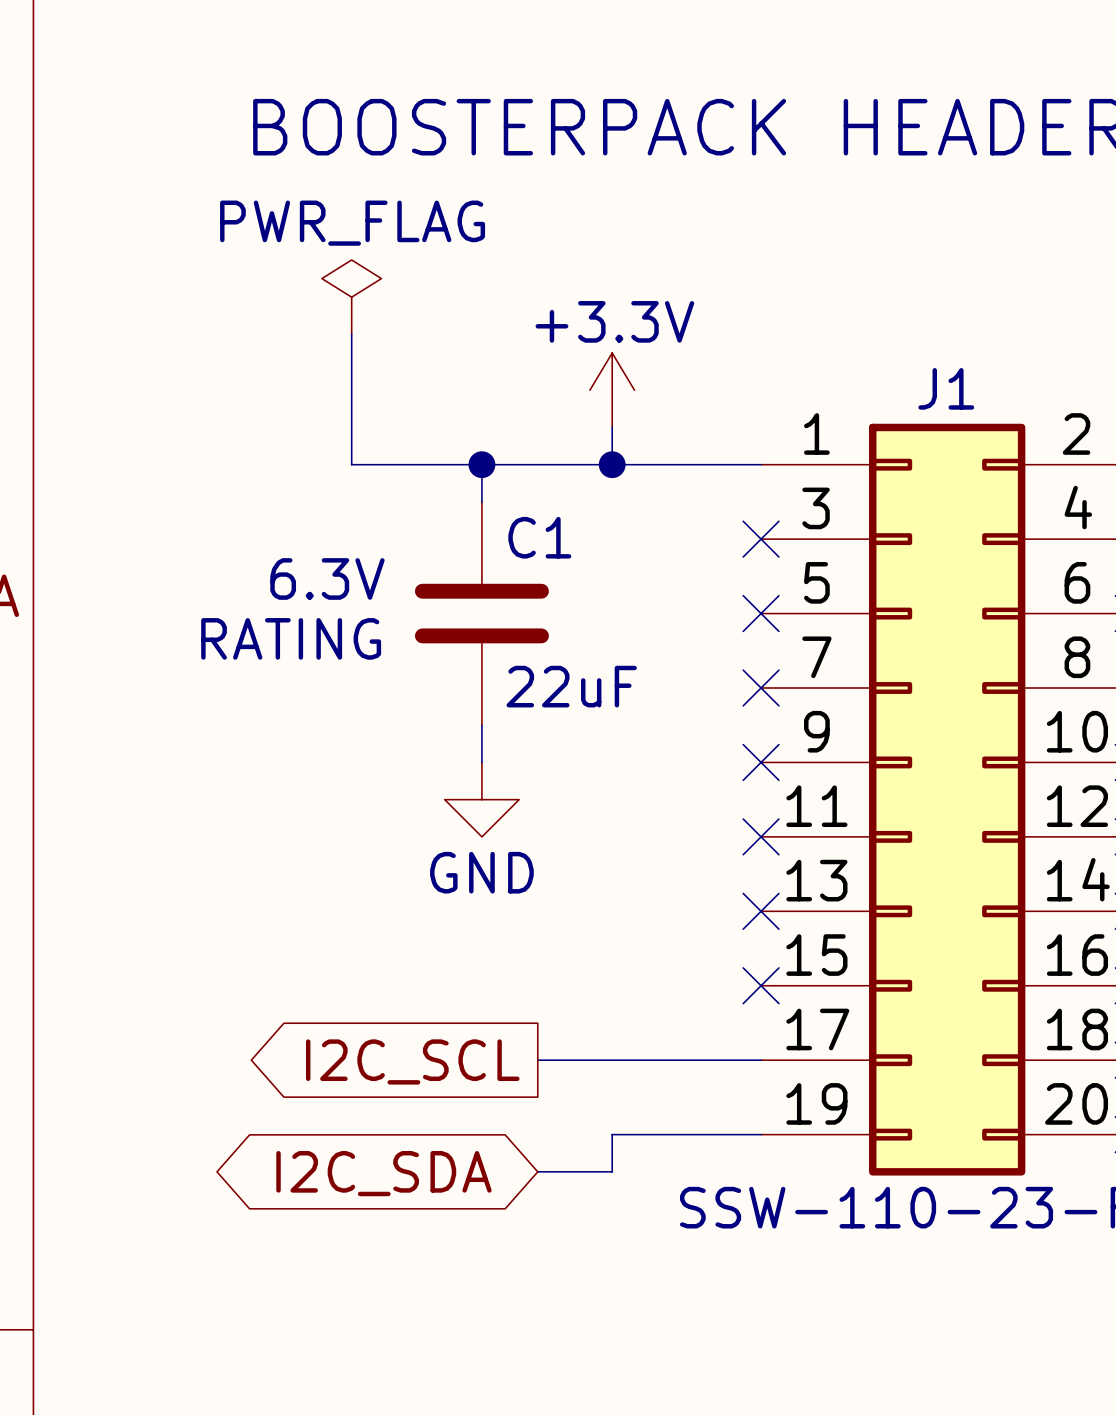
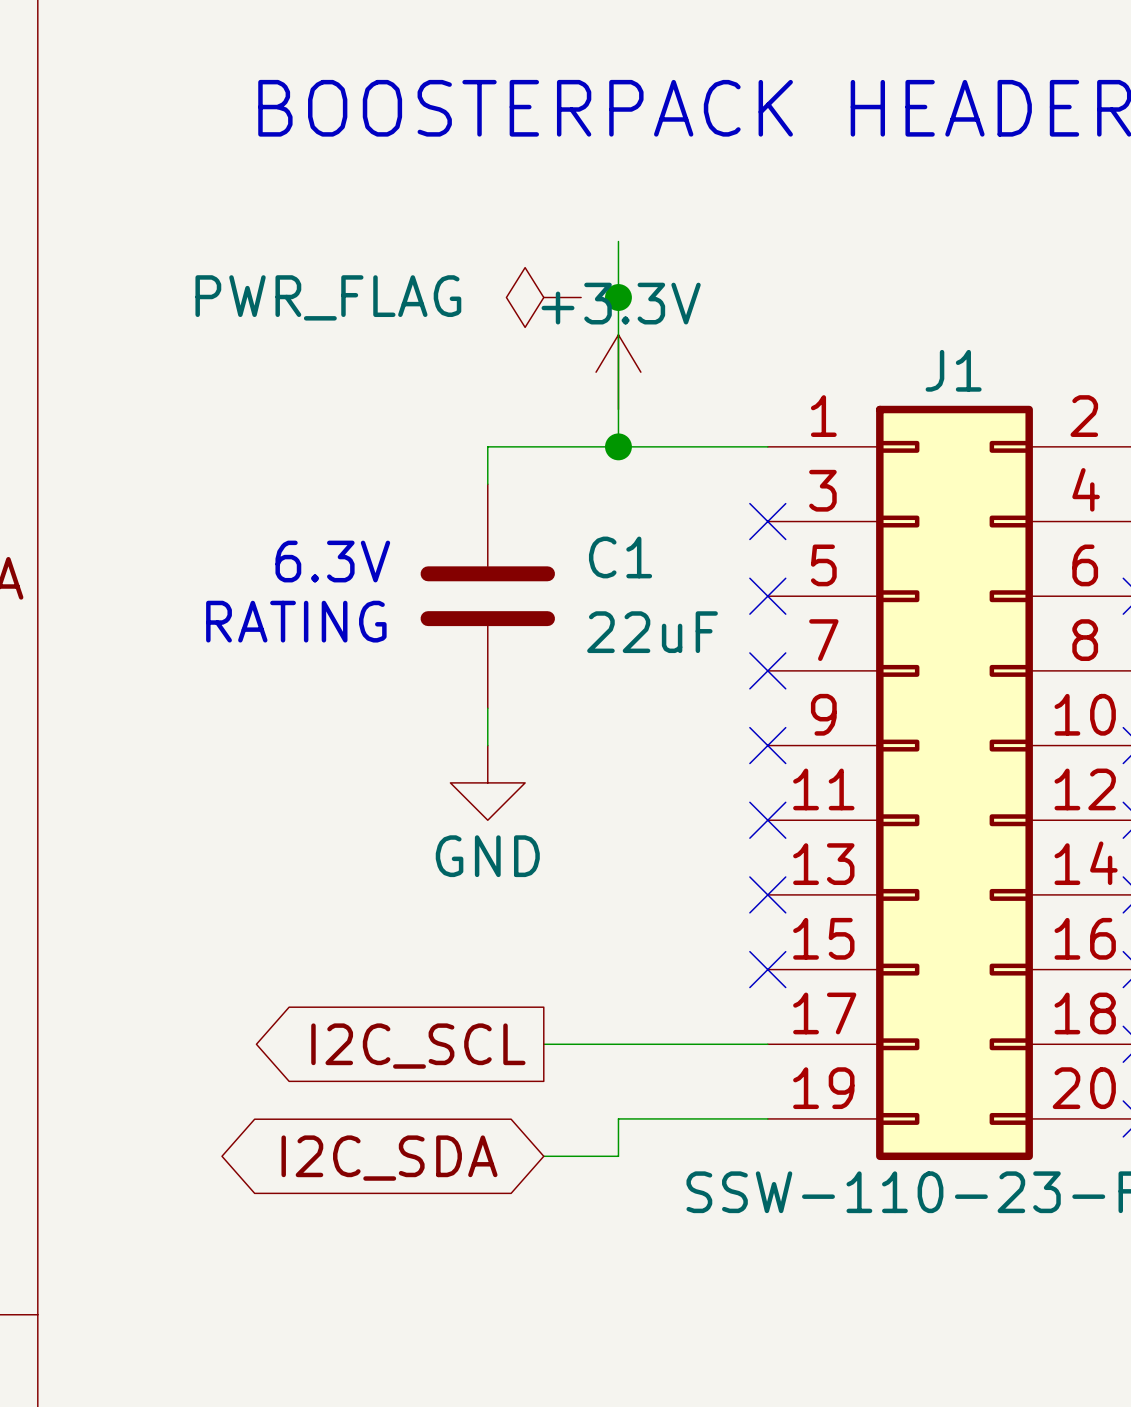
power symbol text position: PWR_FLAG (352, 223) -> PWR_FLAG (328, 297)
wire: none -> (618, 241) (618, 409)
power symbol rotation: 0° (351, 297) -> 90° counterclockwise (543, 297)
power symbol position: PWR_FLAG (351, 297) -> PWR_FLAG (543, 297)
junction: none -> (618, 297)
wire: (351, 334) (351, 464) (481, 464) -> none
junction: (481, 464) -> none
C1 name position: C1 (539, 537) -> C1 (620, 557)
C1 value position: 22uF (571, 686) -> 22uF (652, 632)

